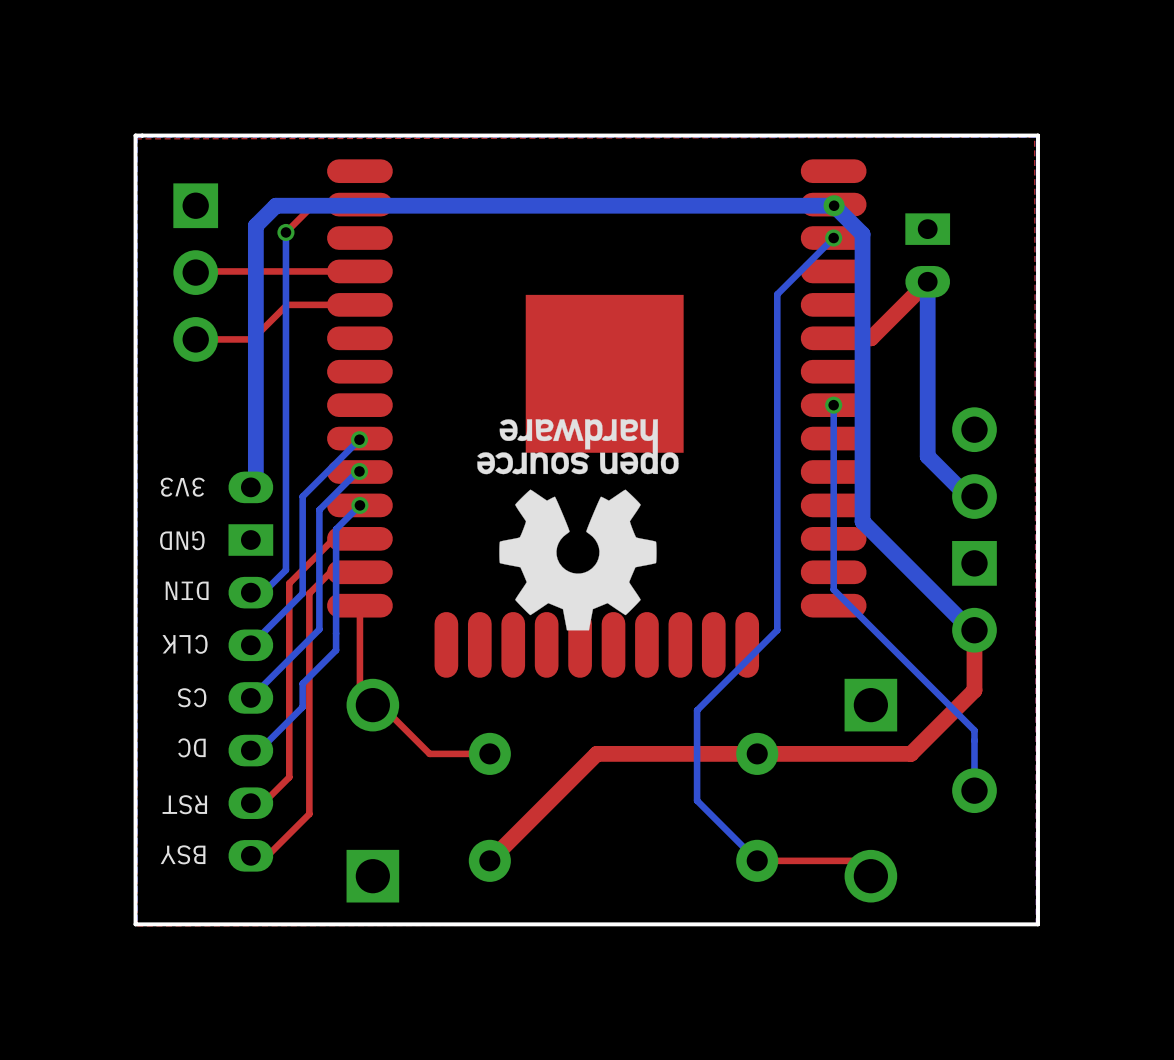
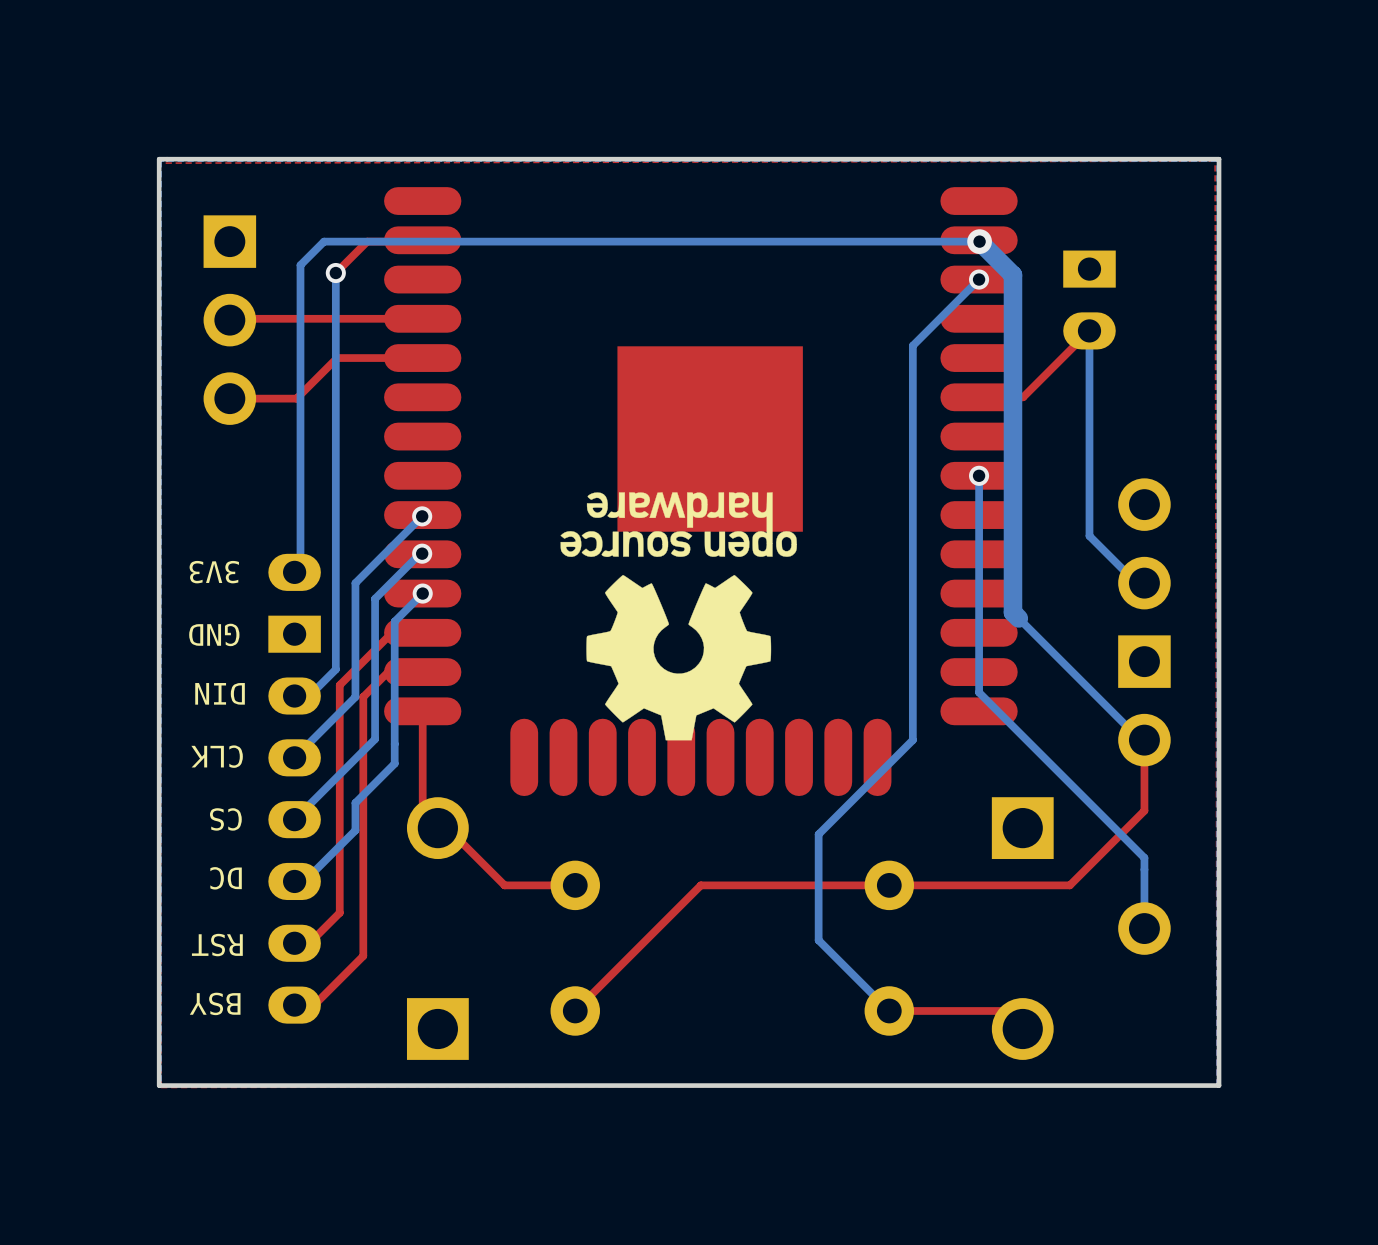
bottom track width: thick (834, 205) (275, 205) (255, 225) (255, 482) -> thin (979, 241) (324, 241) (300, 265) (300, 566)
bottom track width: thick (927, 281) (927, 456) (967, 496) -> thin (1089, 330) (1089, 536) (1136, 583)
top track width: thick (927, 281) (871, 338) (833, 338) -> thin (1089, 330) (1023, 397) (979, 397)
bottom track width: thick (867, 526) (971, 630) -> thin (1018, 618) (1140, 740)
top track width: thick (974, 630) (974, 690) (910, 753) (596, 753) (489, 860) -> thin (1144, 740) (1144, 810) (1069, 885) (700, 885) (575, 1010)

